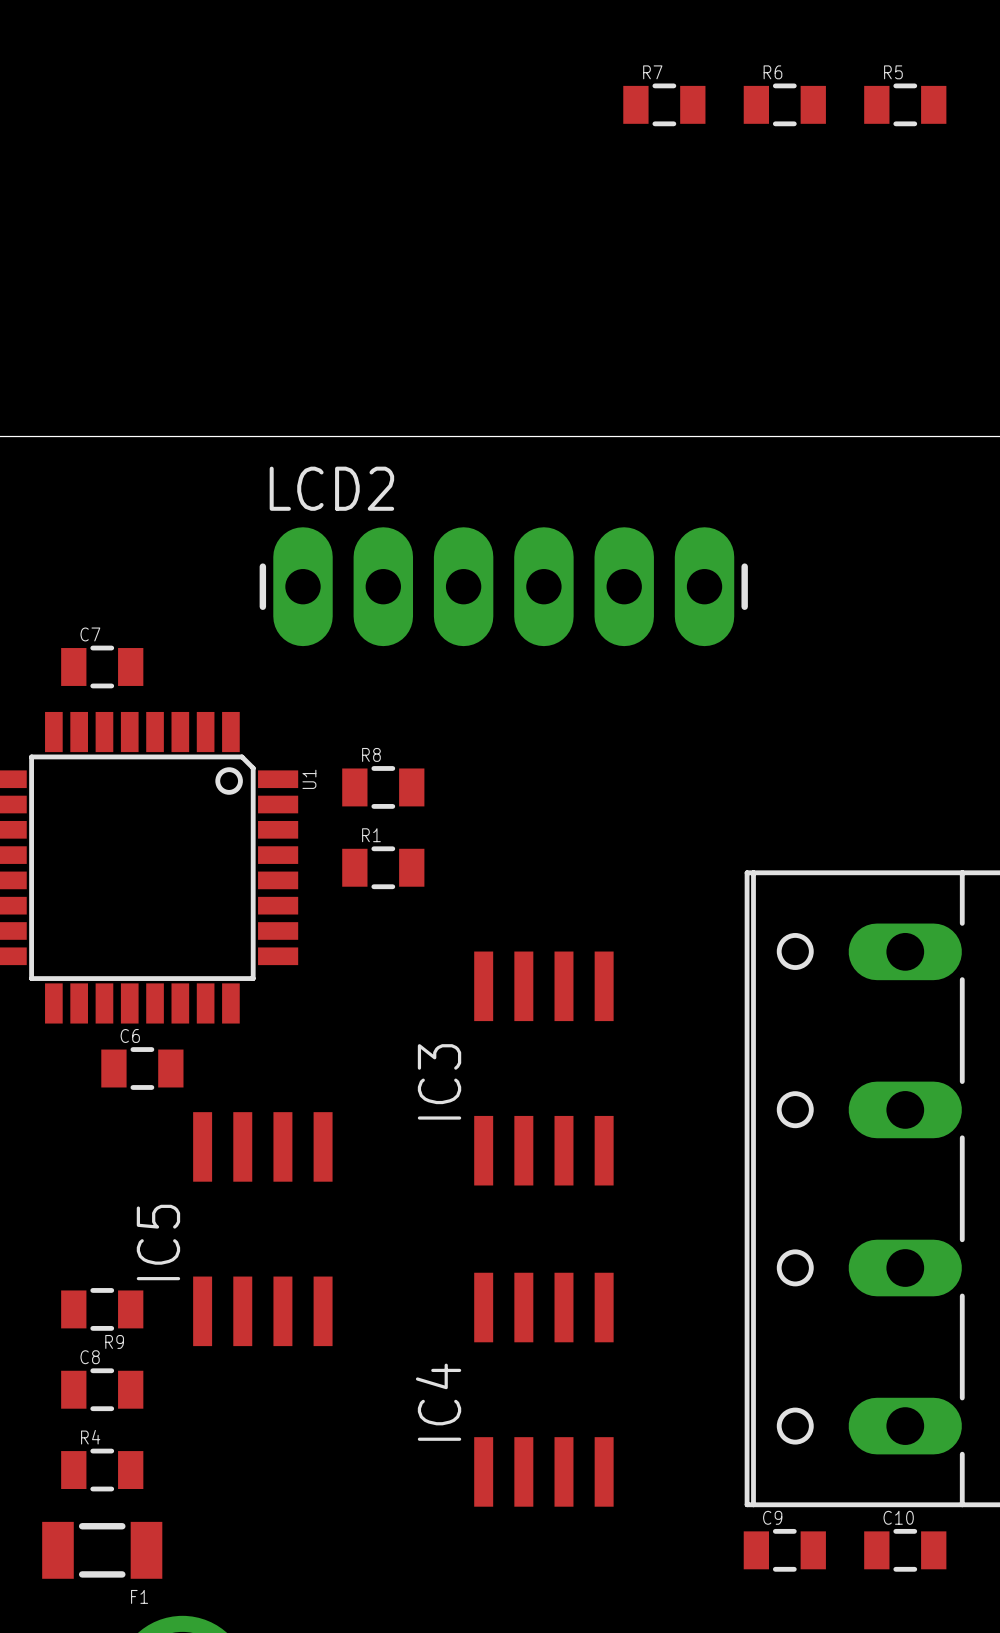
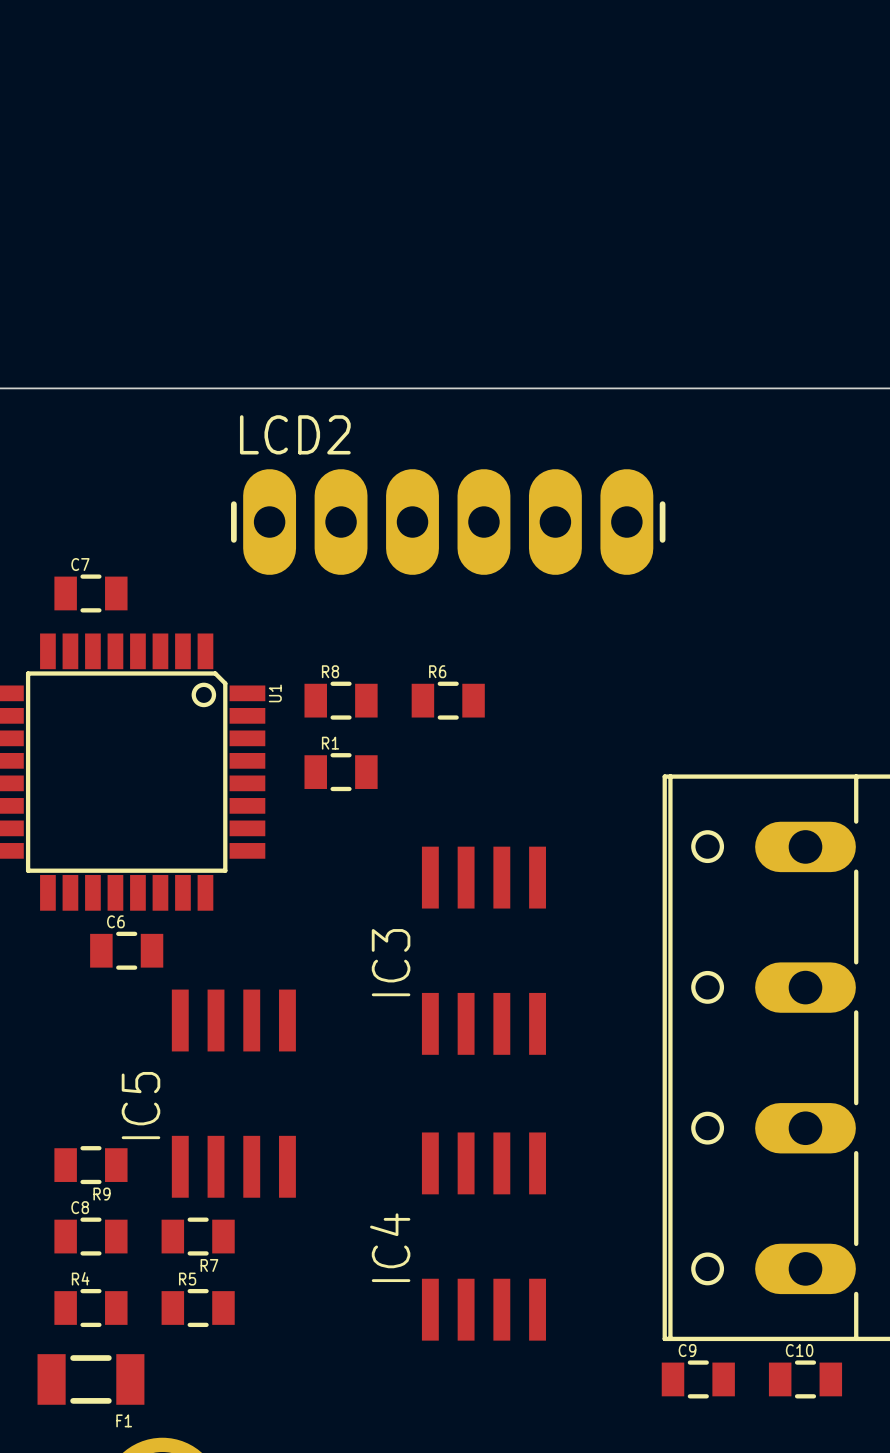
R7 name position: R7 (652, 72) -> R7 (209, 1265)
R7 position: (664, 104) -> (198, 1236)
R6 position: (784, 104) -> (448, 700)
R5 position: (905, 104) -> (198, 1308)

